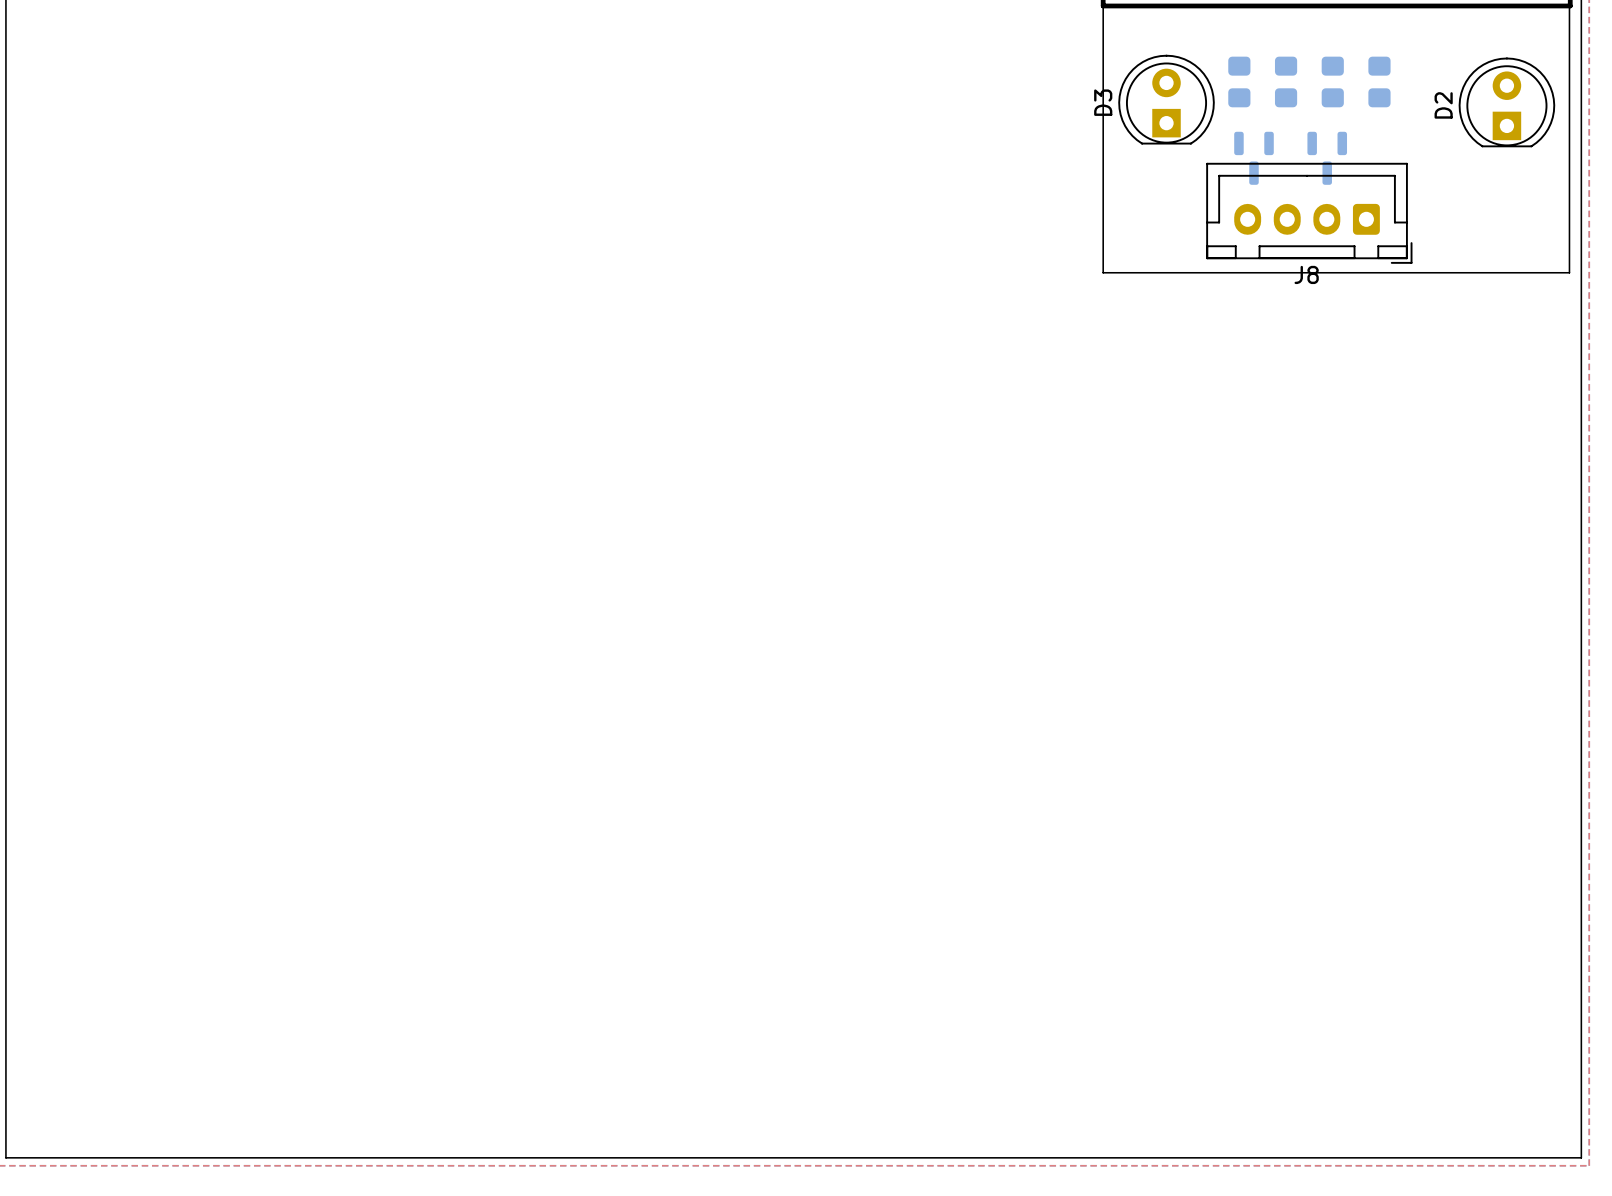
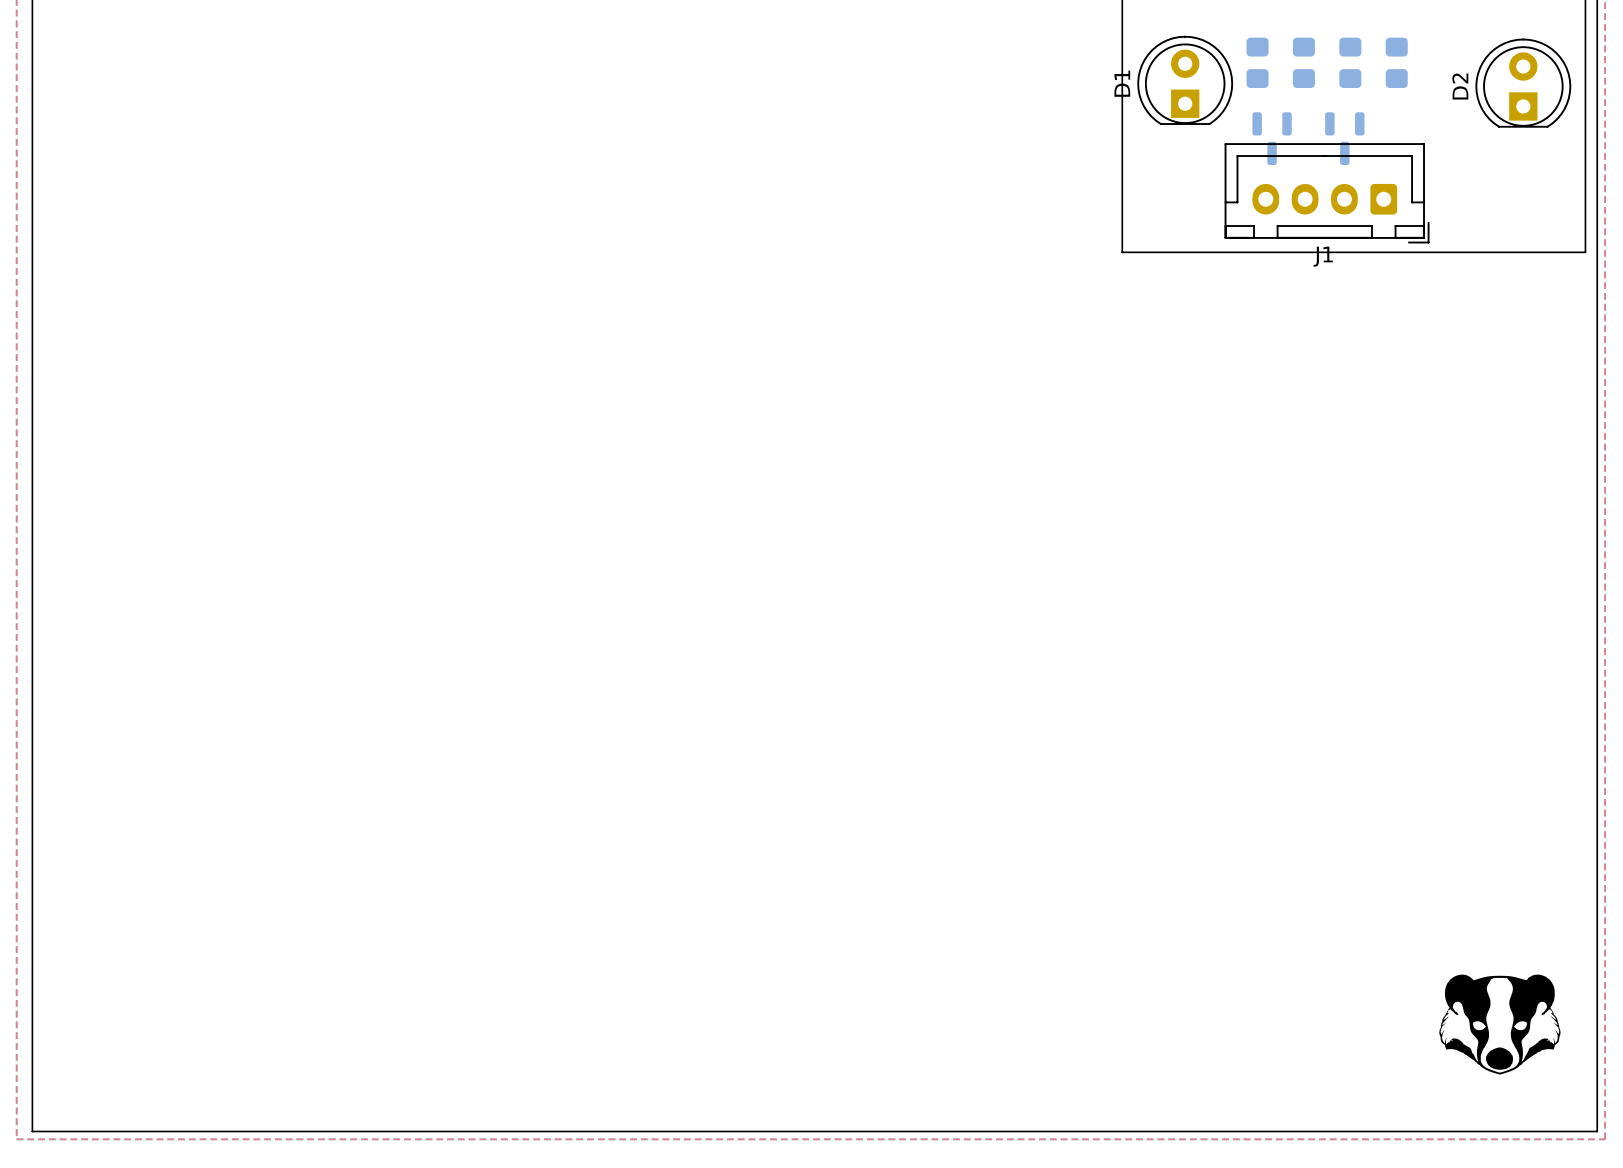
D3 name: D3 (1103, 102) -> D1 (1122, 83)
J8 name: J8 (1306, 274) -> J1 (1323, 256)
drawing: none -> [1439, 974, 1561, 1075]

